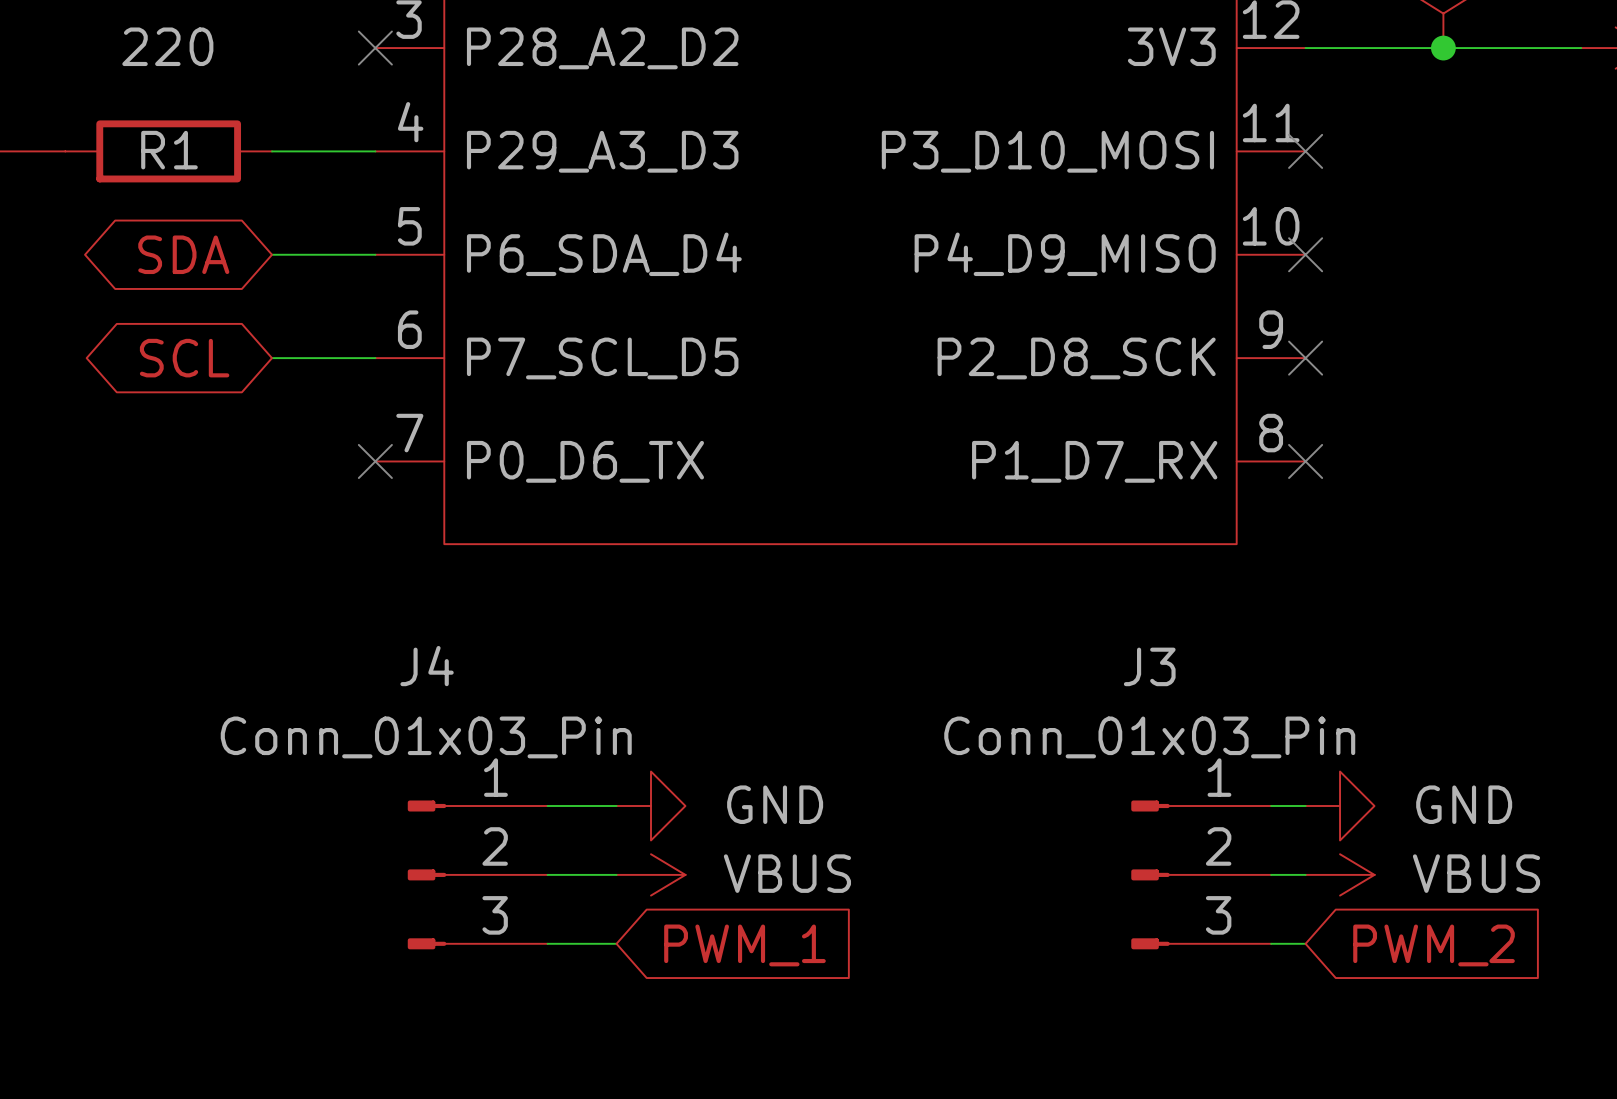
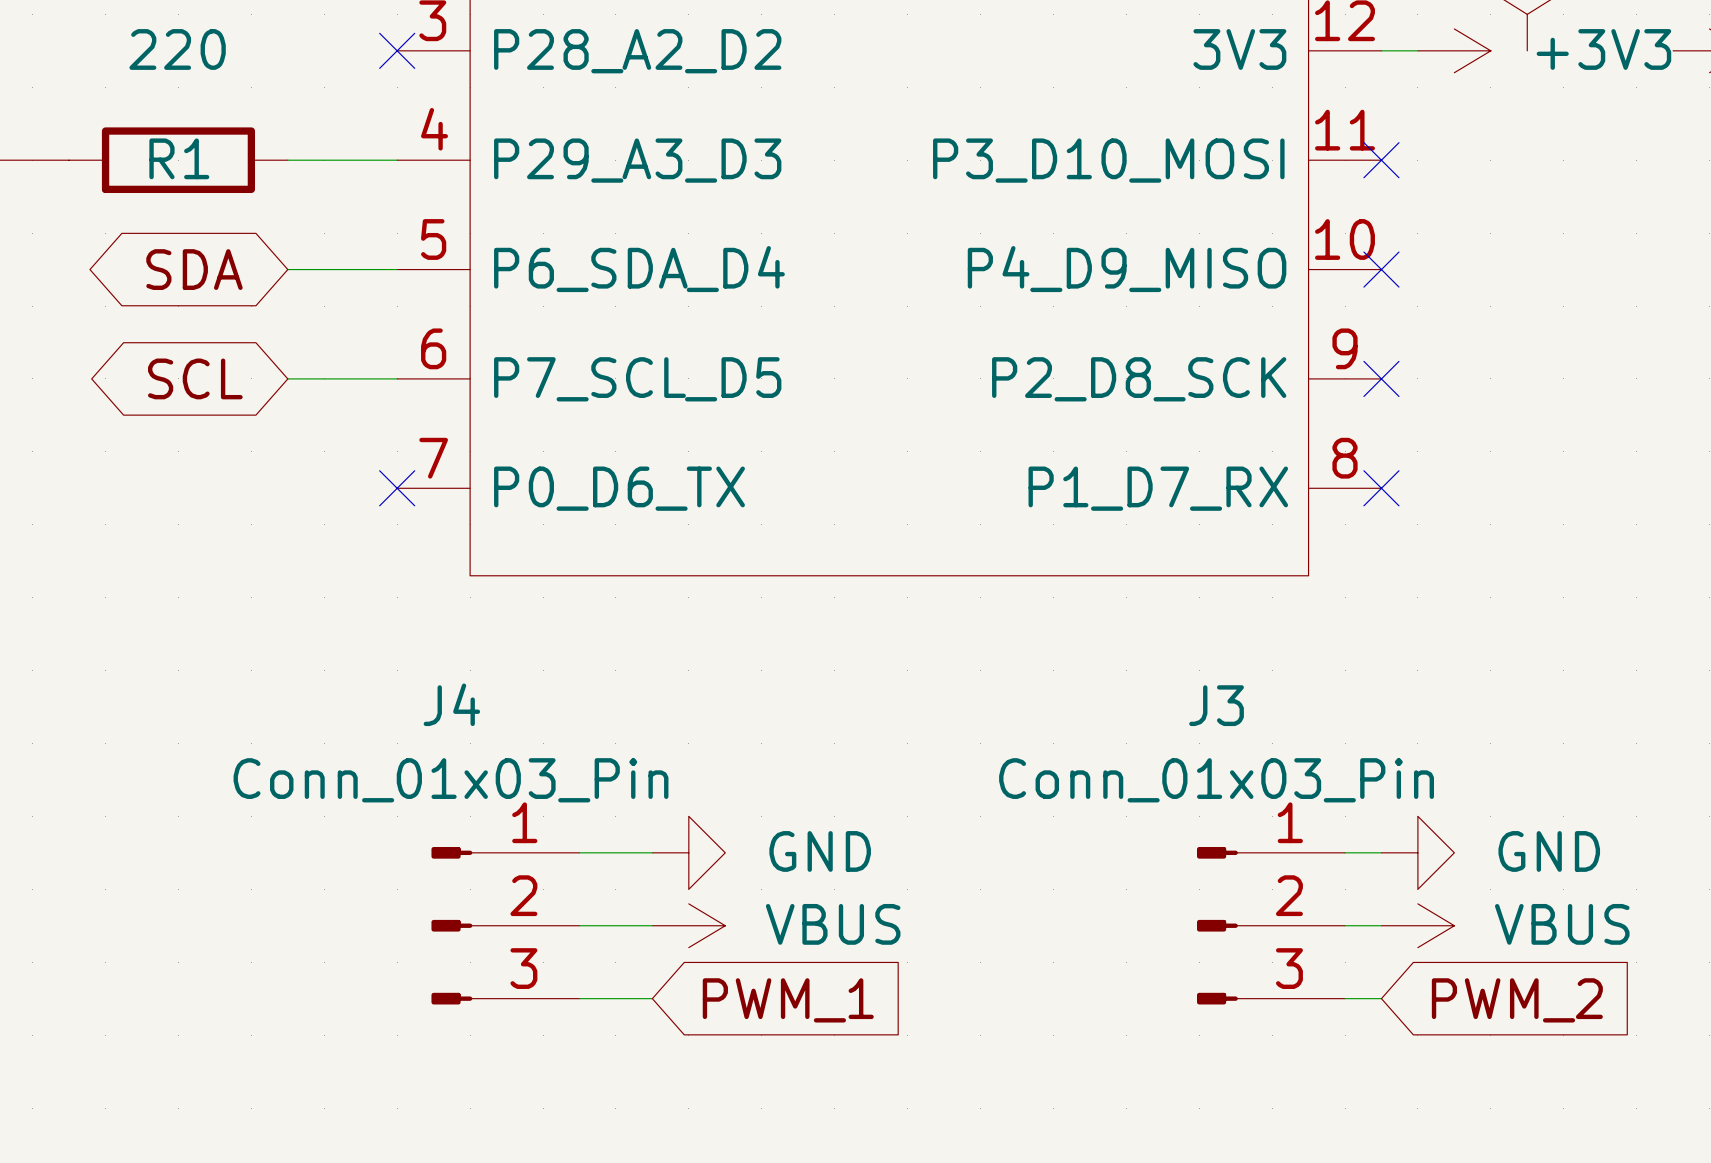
wire: (1340, 48) (1581, 48) -> none
power symbol: none -> +3V3 (1454, 50)
junction: (1443, 48) -> none

